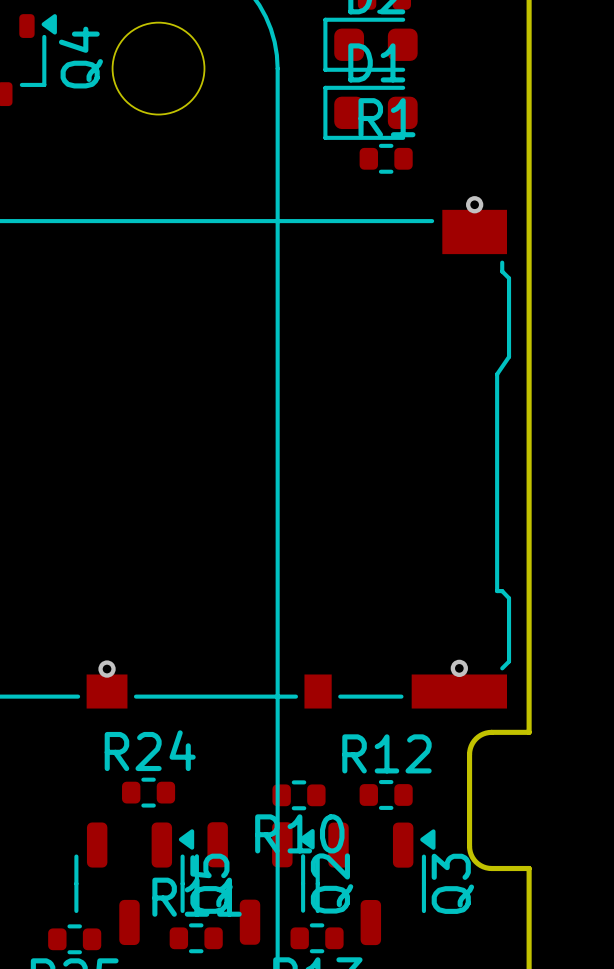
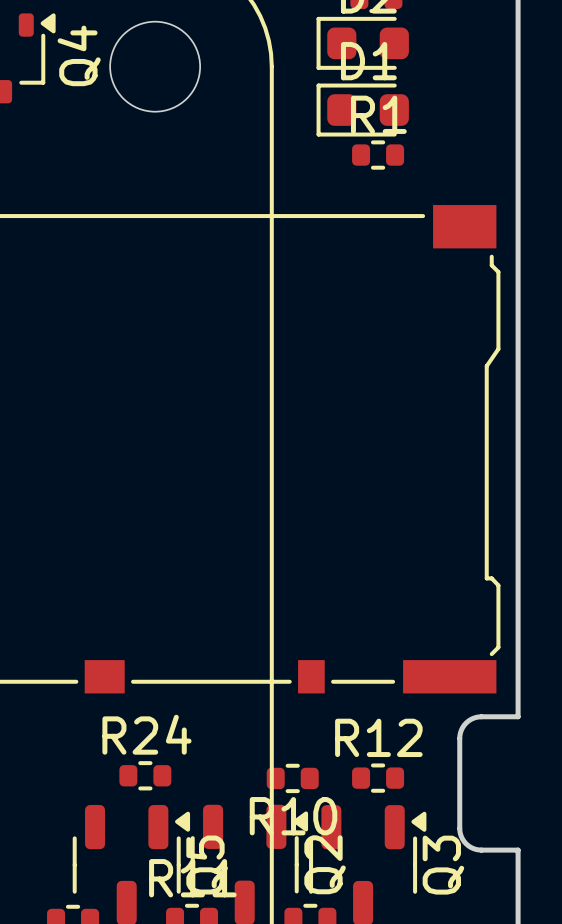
via: (474, 204) -> none
via: (459, 668) -> none
via: (107, 669) -> none

